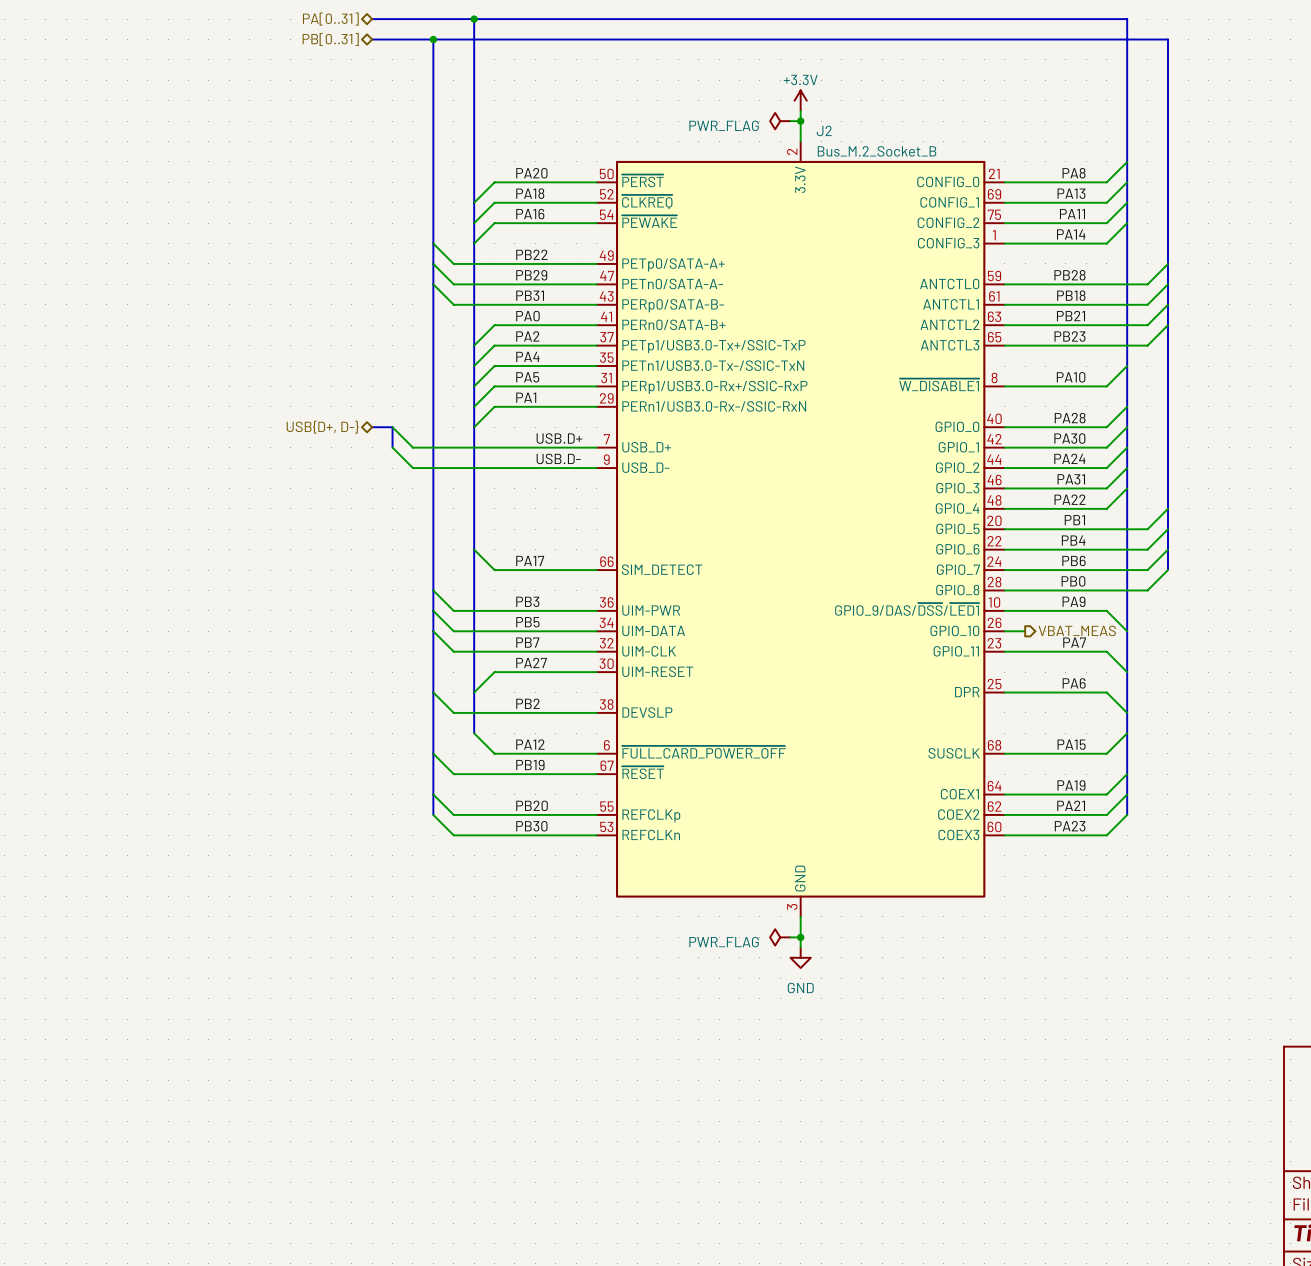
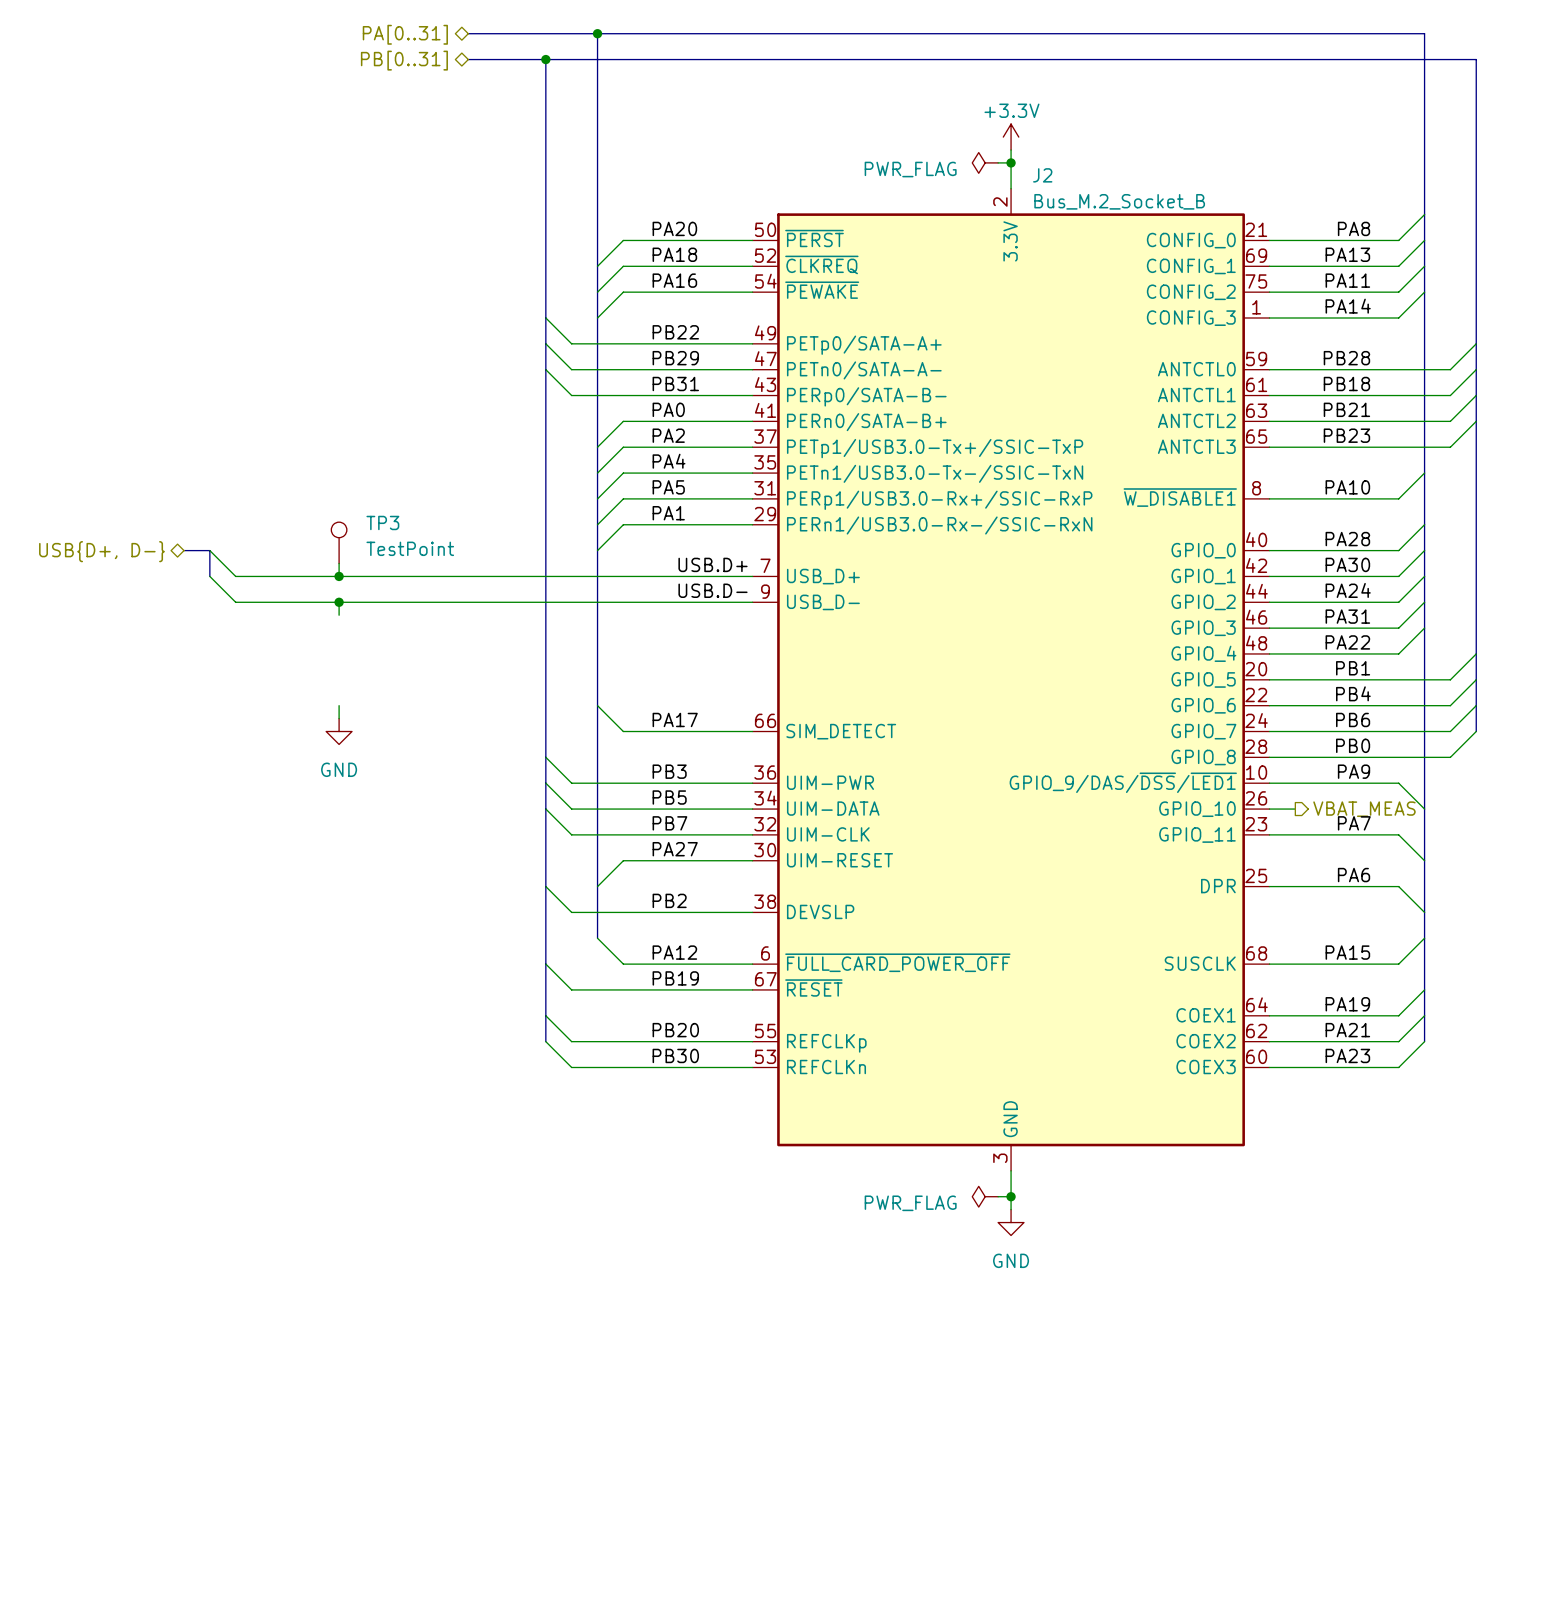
TP3: none -> TestPoint (339, 542)
hierarchical label: none -> USB{D+, D-} (101, 551)
bus: none -> (184, 550) (209, 550) (209, 576)
hierarchical label: USB{D+, D-} (322, 427) -> none
bus: (372, 427) (392, 427) (392, 447) -> none
wire: (392, 427) (412, 447) -> (209, 550) (235, 576) (520, 576)
wire: none -> (339, 563) (339, 576)
junction: none -> (339, 576)
wire: (392, 447) (412, 468) -> (209, 576) (235, 602) (520, 602)
wire: none -> (339, 602) (339, 615)
junction: none -> (339, 602)
wire: none -> (339, 705) (339, 718)
power symbol: none -> GND (339, 731)

